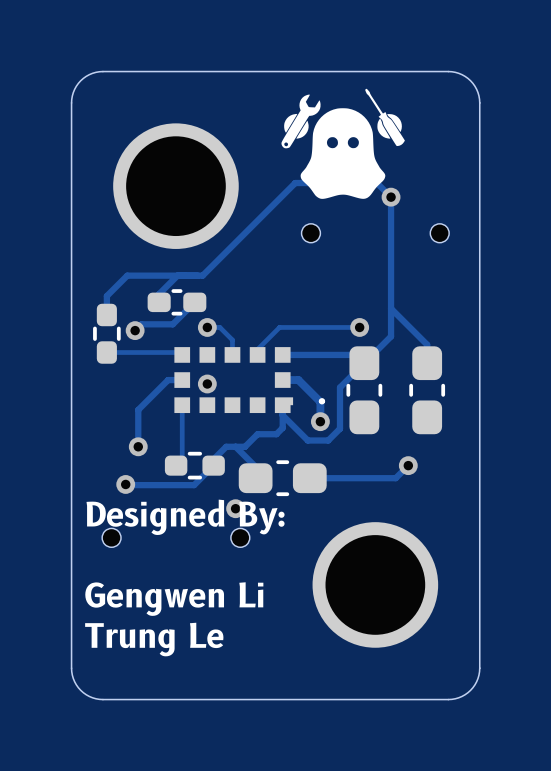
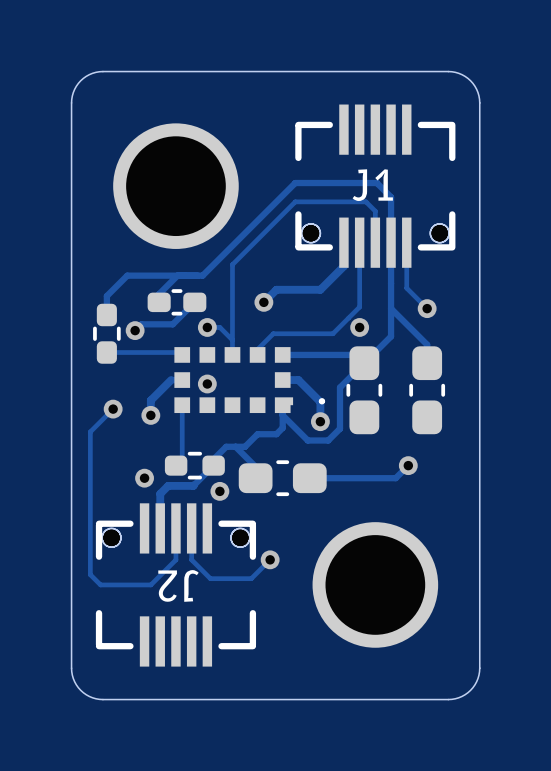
drawing: [281, 88, 405, 199] -> none
J1: none -> (375, 186)
via: (391, 197) -> none
track: none -> (343, 242) (343, 266) (320, 289) (276, 289) (263, 302)
track: none -> (375, 242) (375, 211) (365, 201) (295, 201) (232, 264) (232, 340)
track: none -> (406, 242) (406, 288) (427, 308)
via: none -> (263, 302)
via: none -> (427, 308)
track: (359, 327) (279, 327) (273, 333) -> (359, 242) (359, 307) (332, 333) (273, 333)
track: (171, 380) (168, 380) (138, 409) (138, 446) -> (171, 380) (150, 400) (150, 415)
track: none -> (113, 409) (90, 431) (90, 574) (100, 584) (150, 584) (175, 559) (175, 528)
via: none -> (113, 409)
via: none -> (150, 415)
via: (138, 446) -> none
track: (125, 484) (194, 485) -> (160, 528) (160, 493) (168, 485) (194, 485)
via position: (125, 484) -> (144, 478)
via position: (235, 508) -> (219, 491)
text: Designed By: (185, 517) -> none
track: none -> (191, 528) (191, 559) (210, 578) (251, 578) (270, 559)
via: none -> (270, 559)
J2: none -> (175, 584)
text: Gengwen Li (174, 599) -> none
text: Trung Le (154, 639) -> none

